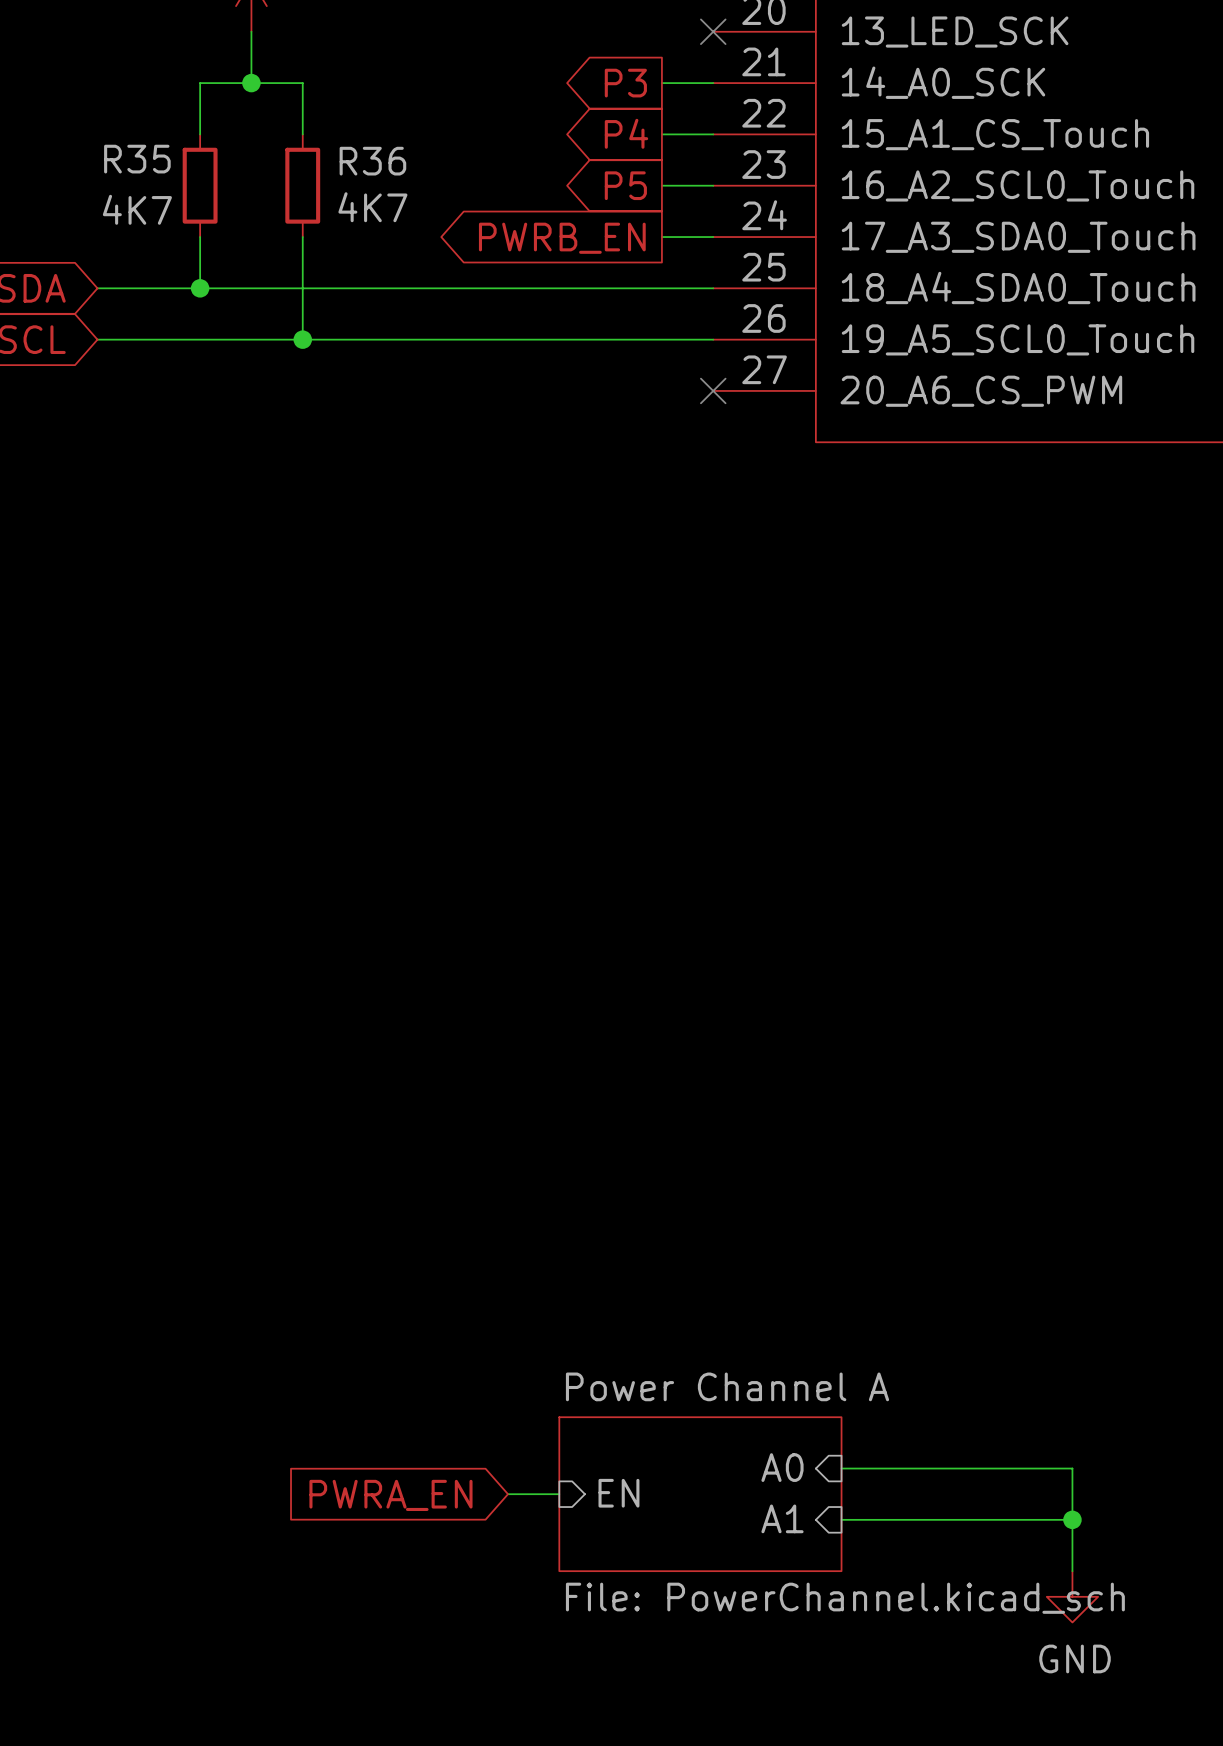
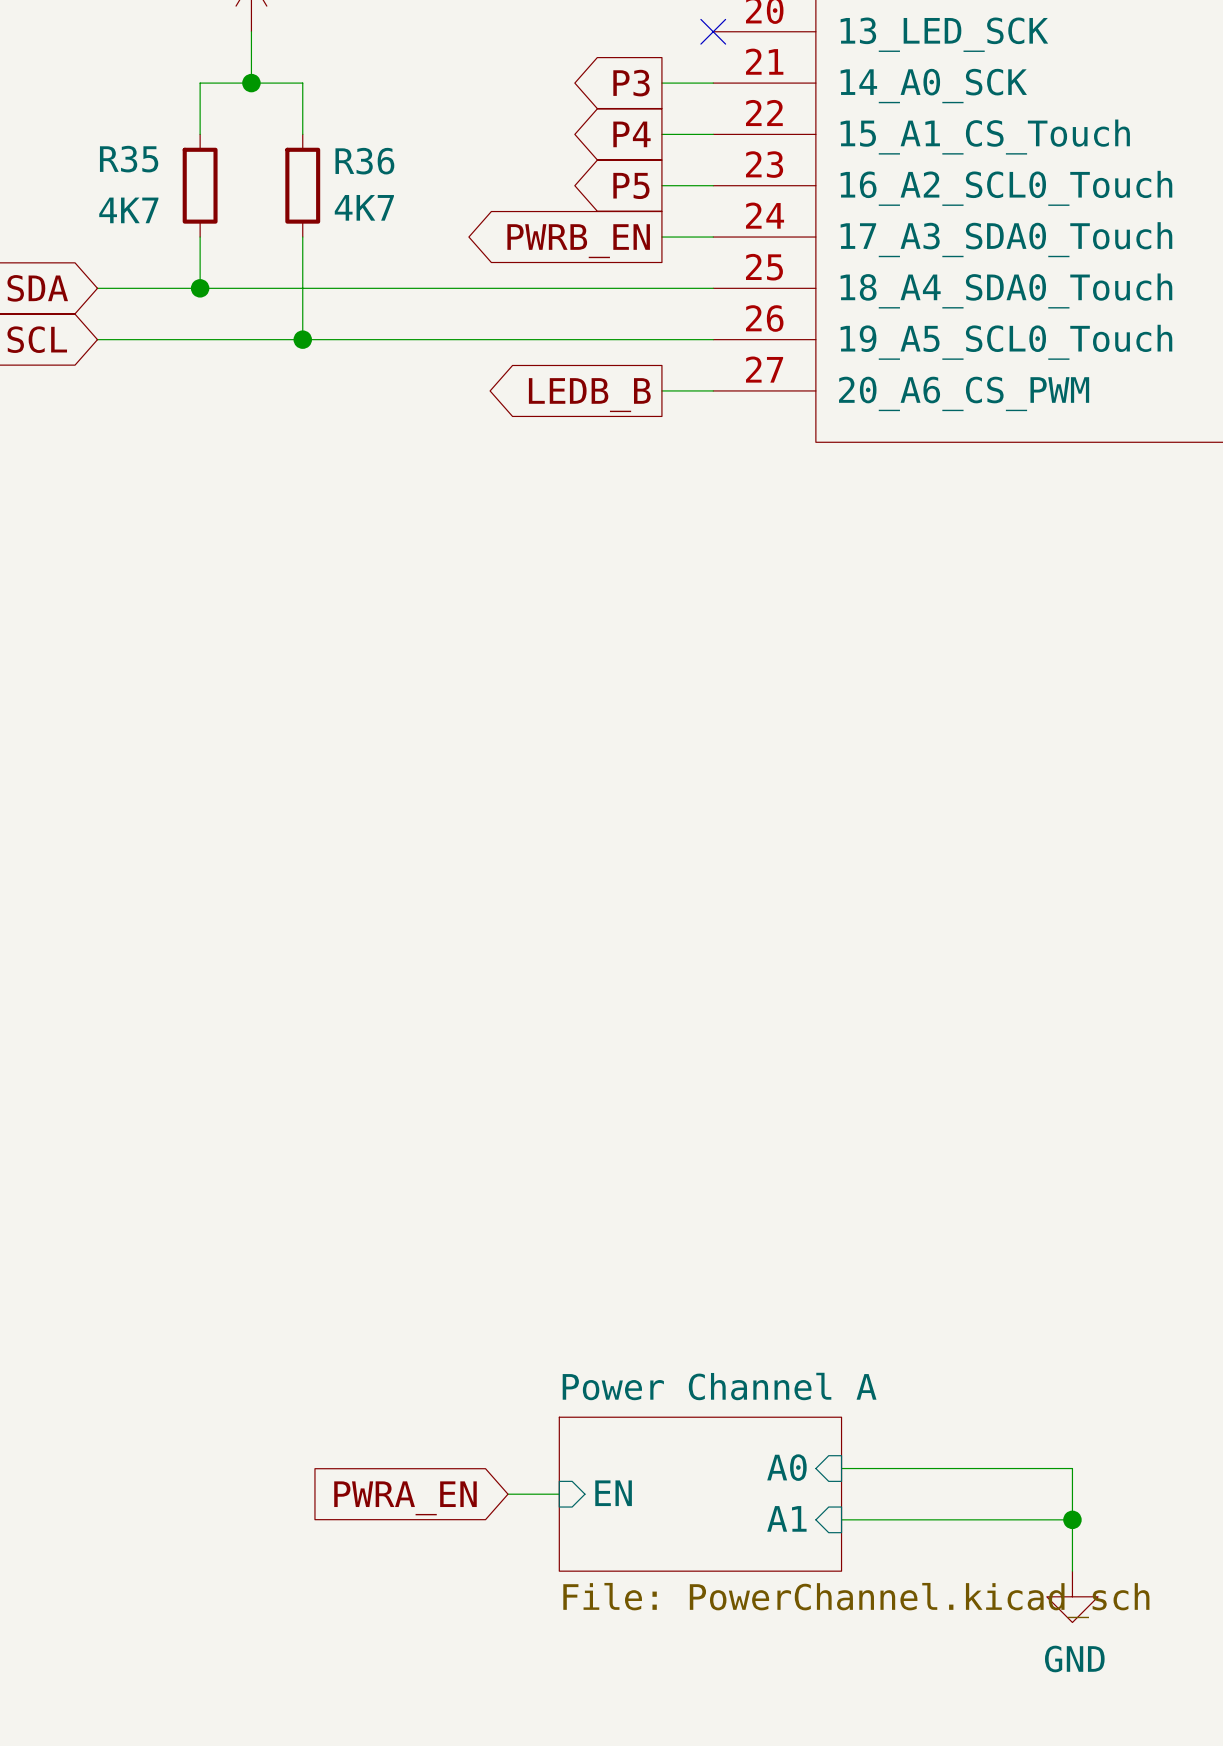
wire: none -> (661, 390) (713, 390)
no-connect mark: (713, 390) -> none
global label: none -> LEDB_B (589, 395)

